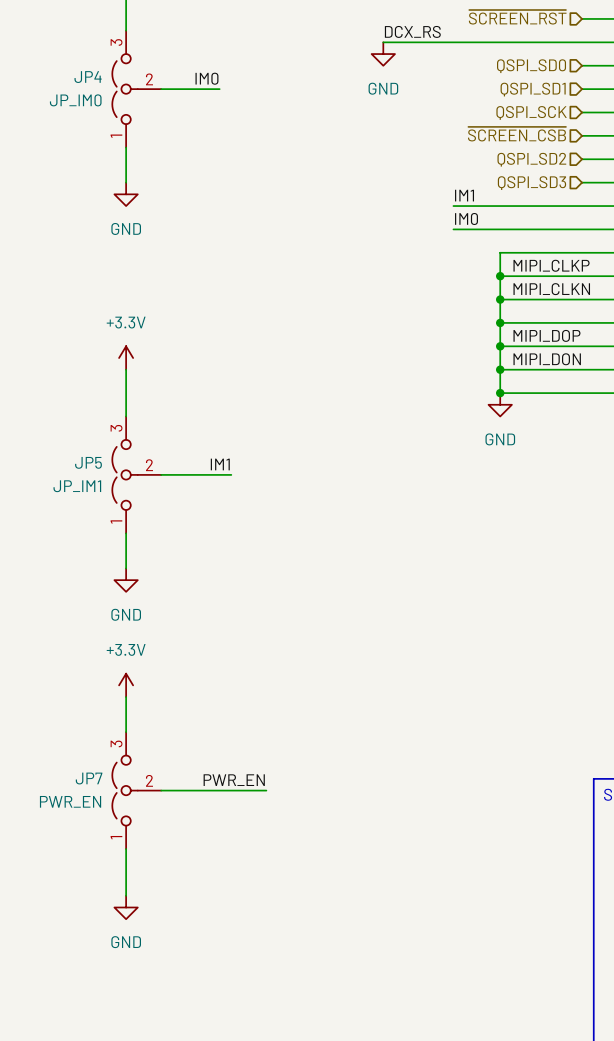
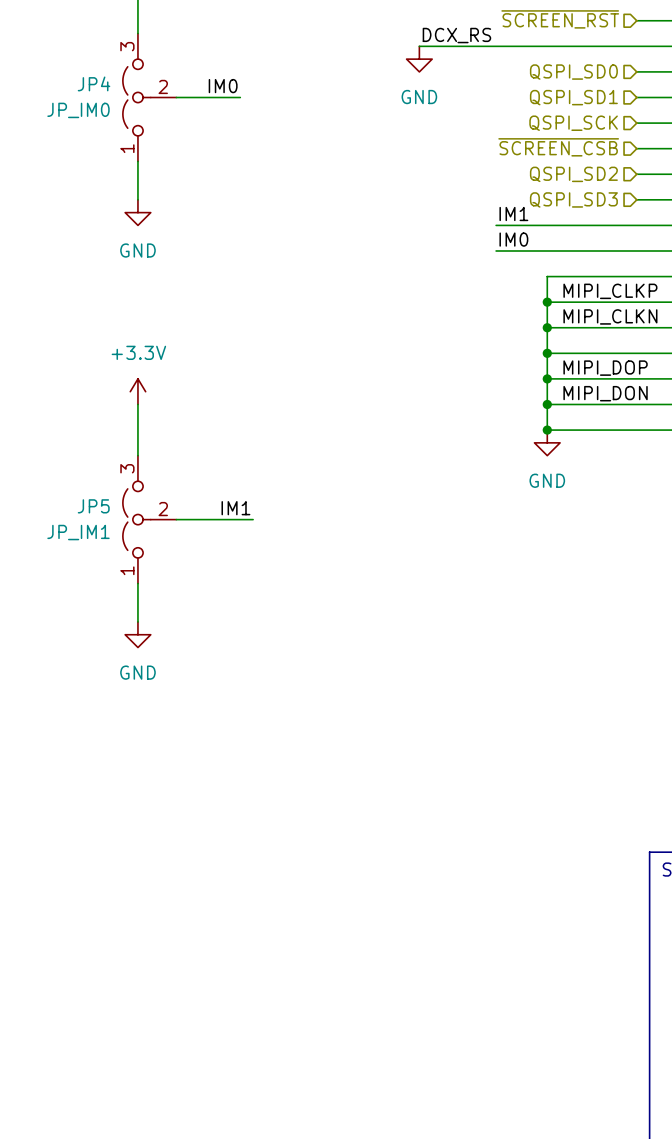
power symbol: +3.3V (126, 685) -> none
wire: (126, 697) (126, 732) -> none
label: PWR_EN (234, 780) -> none
JP7: PWR_EN (136, 790) -> none
wire: (161, 790) (266, 790) -> none
wire: (126, 849) (126, 895) -> none
power symbol: GND (126, 907) -> none

